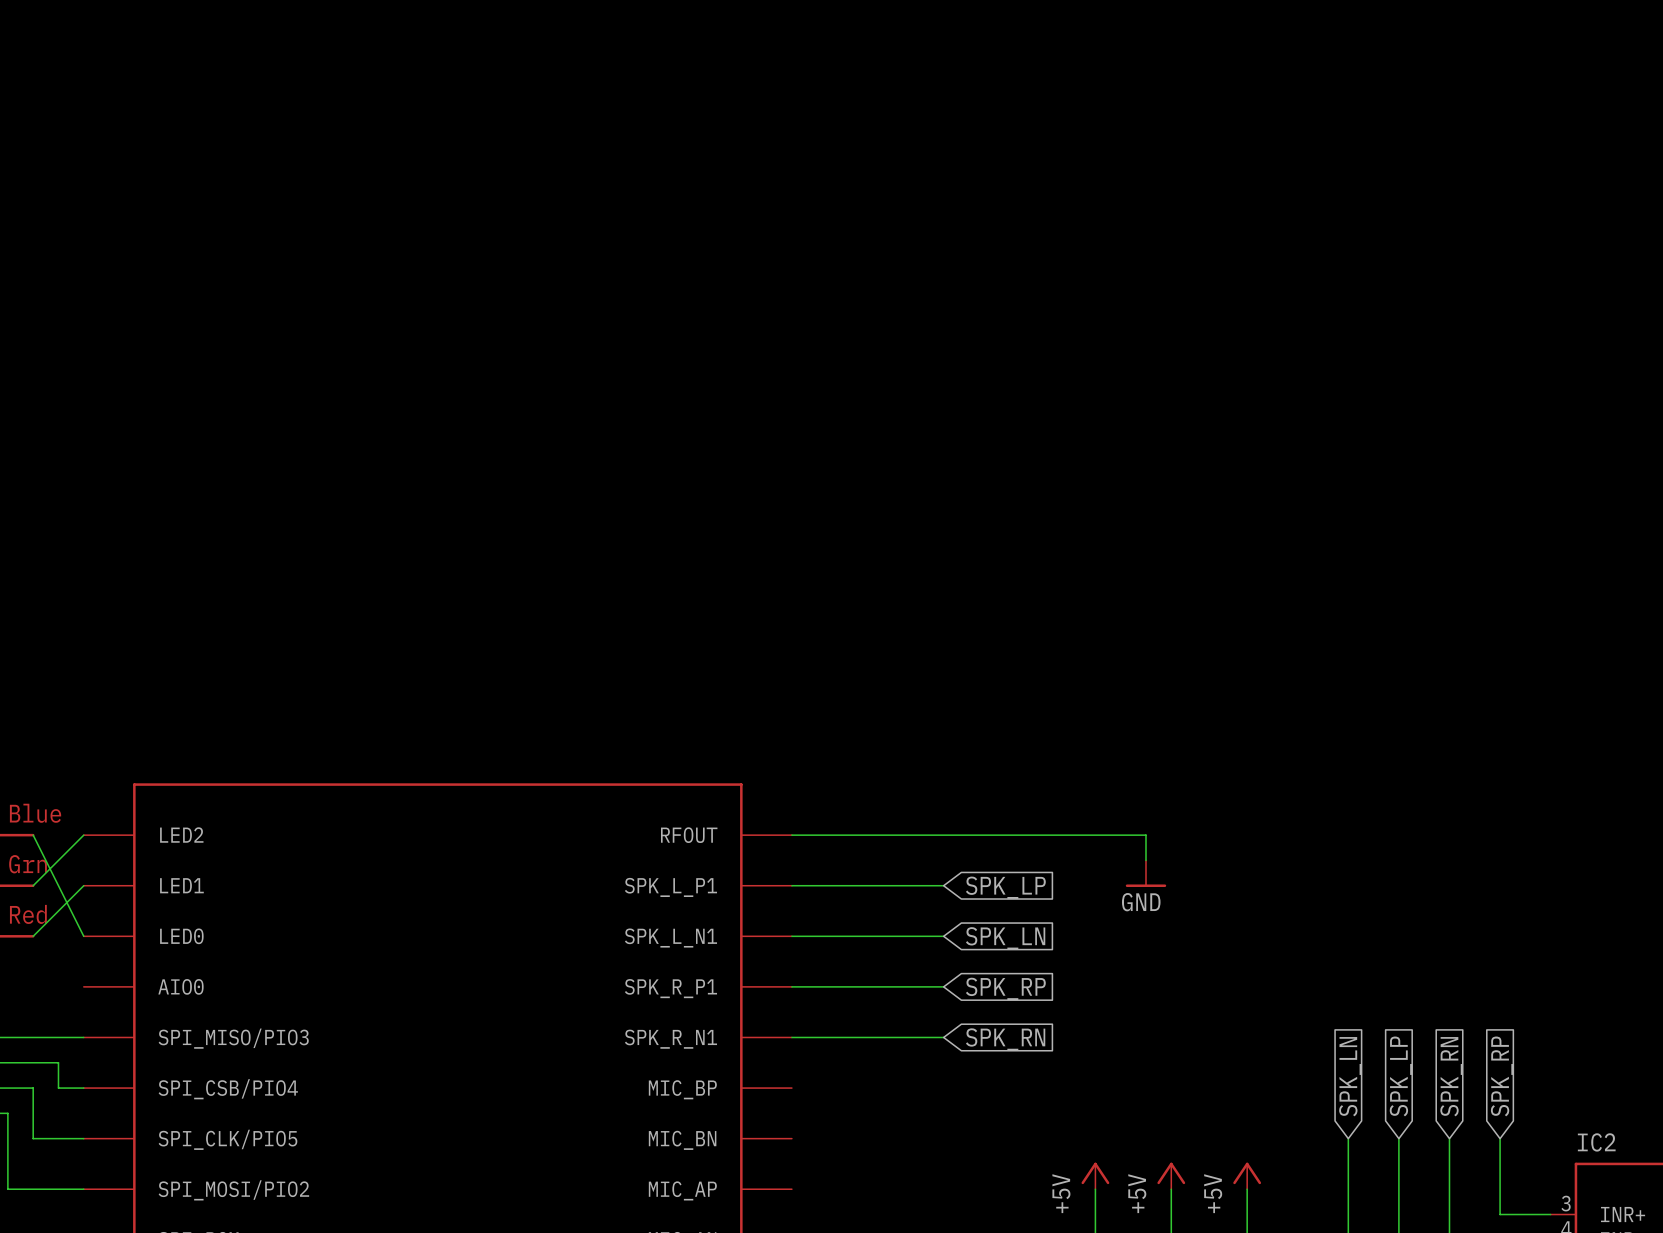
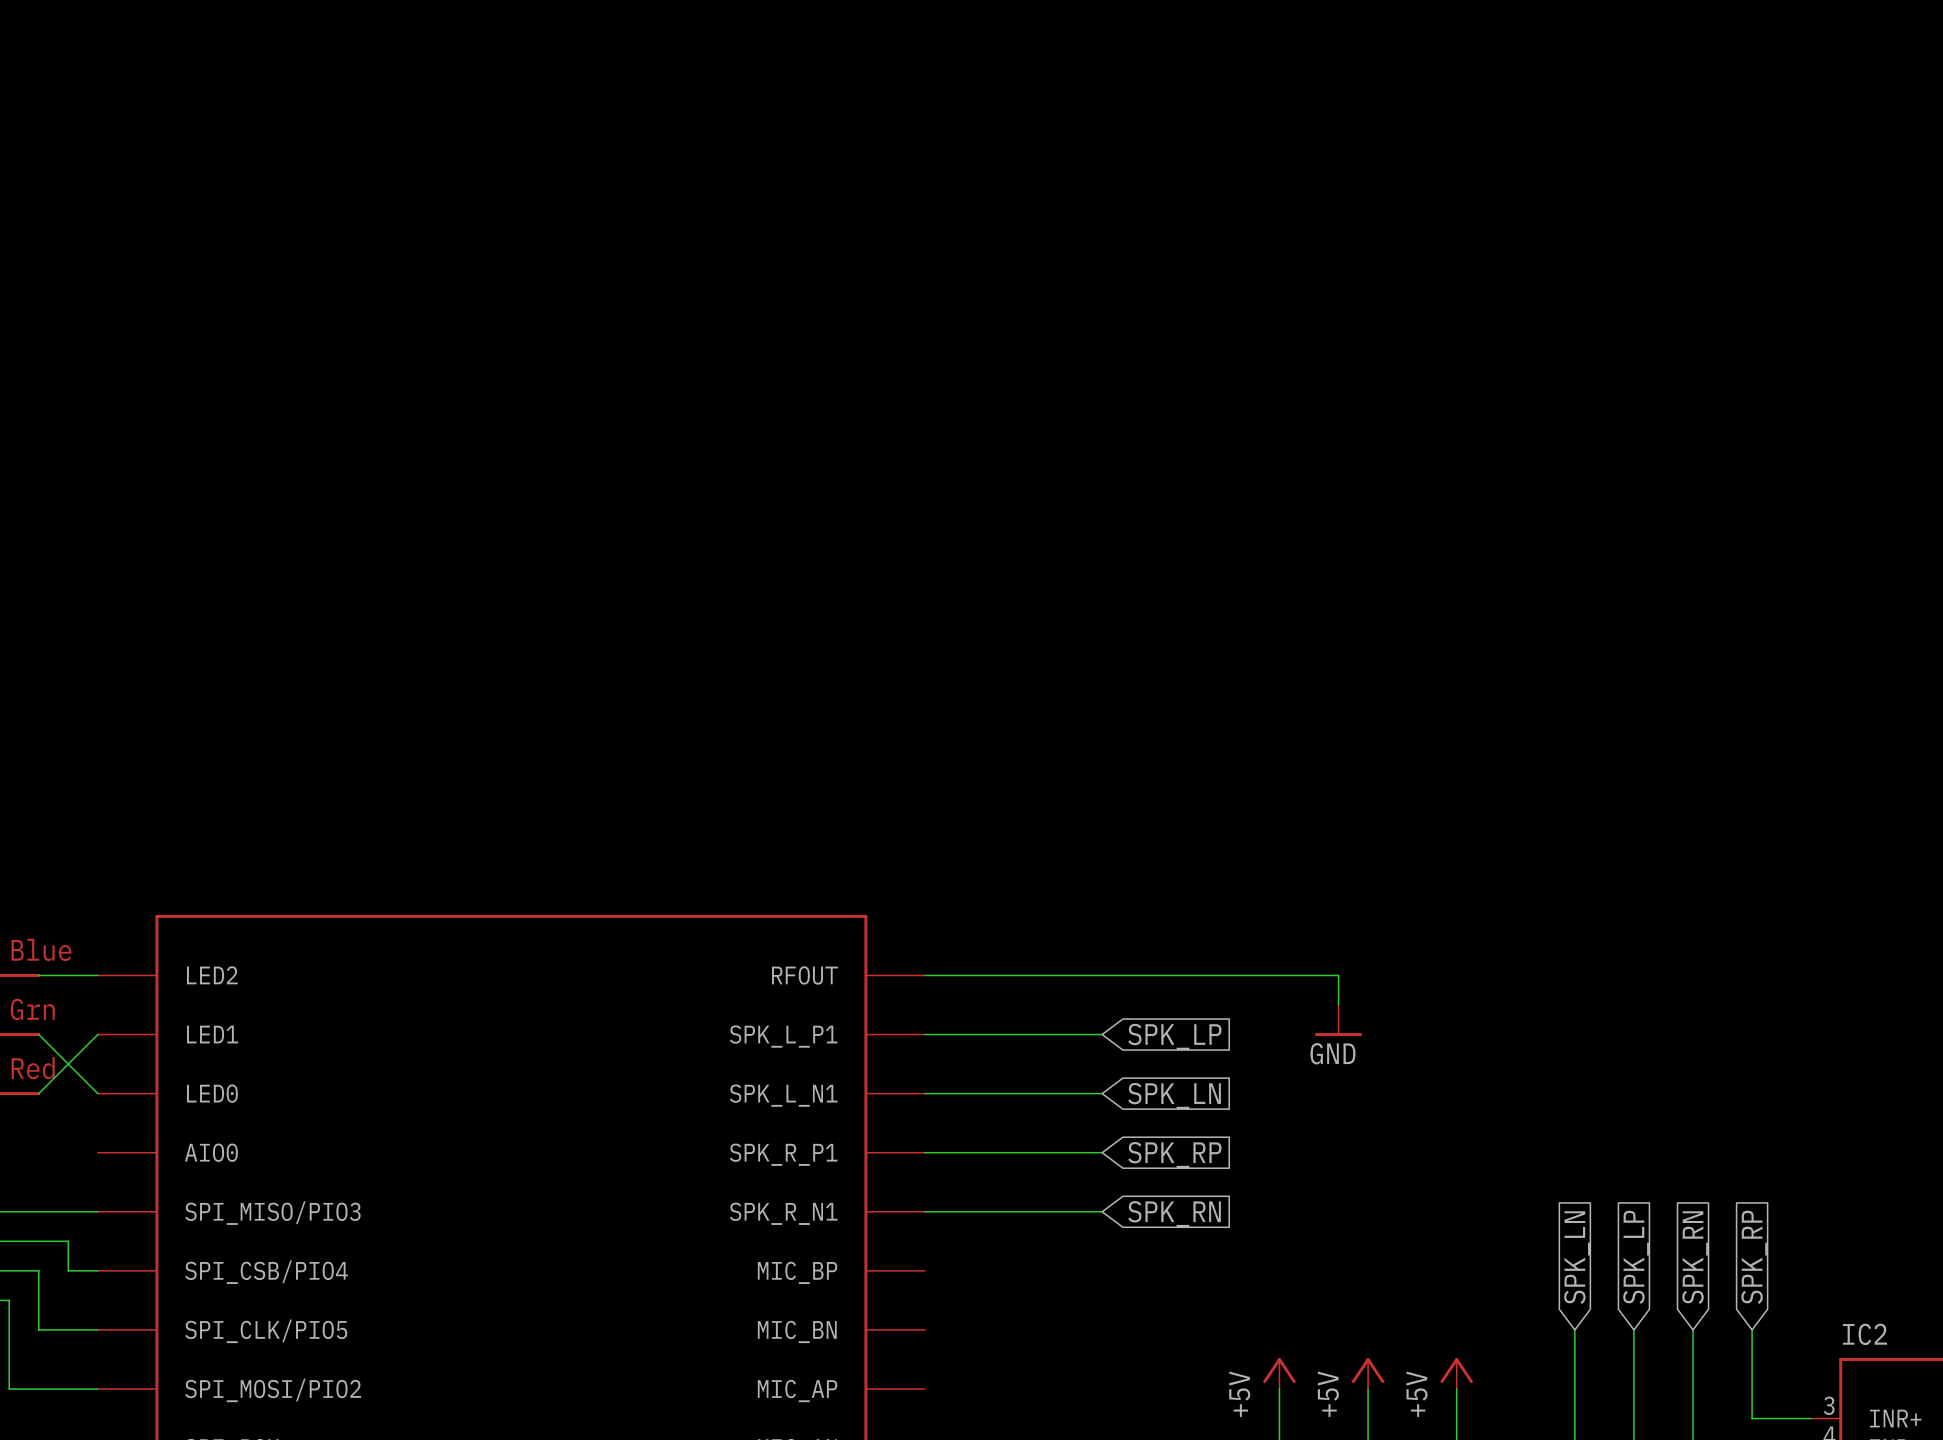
wire: (33, 835) (83, 936) -> (38, 1034) (97, 1093)
wire: (83, 835) (33, 885) -> (97, 975) (38, 975)

